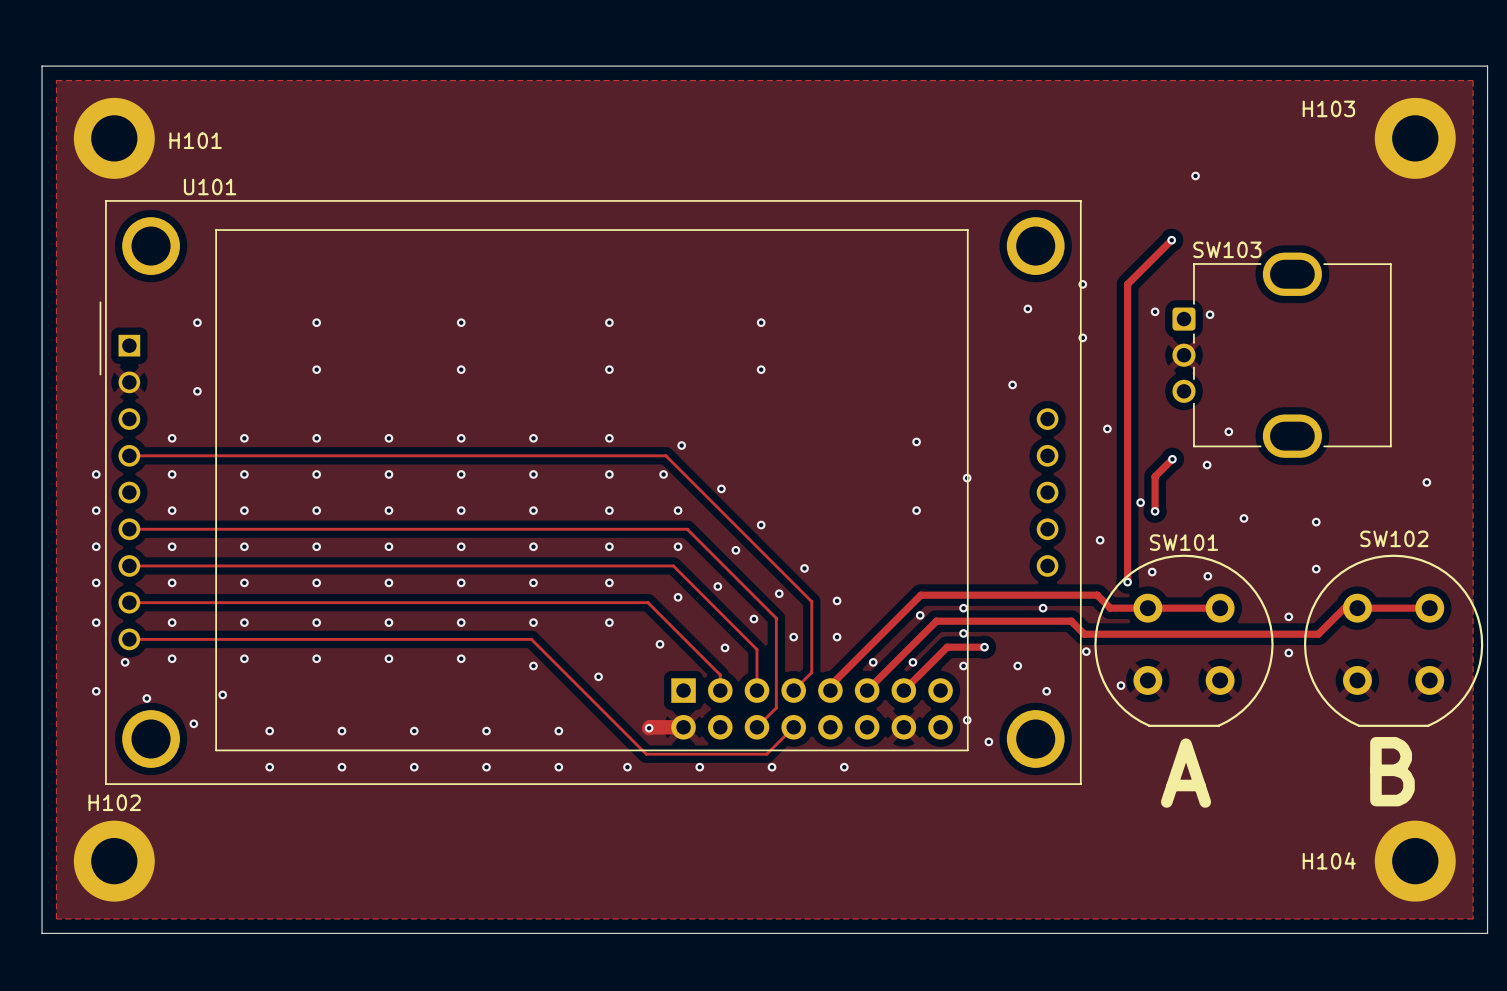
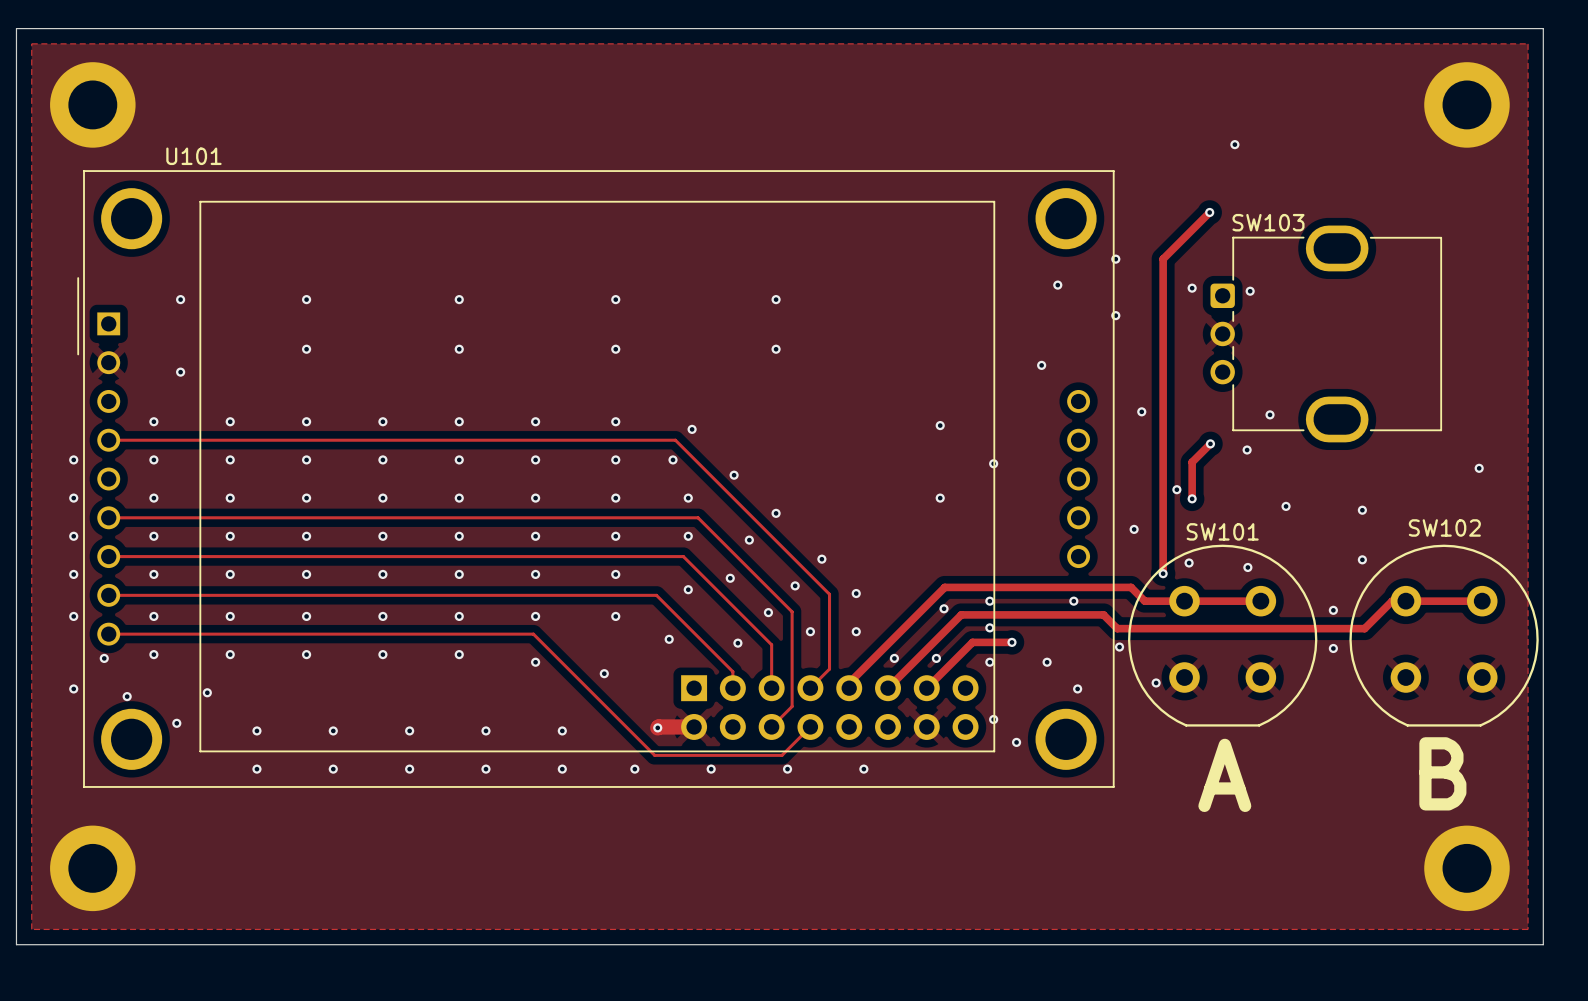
H103 name: H103 (1328, 108) -> none
H101 name: H101 (195, 140) -> none
H102 name: H102 (114, 802) -> none
H104 name: H104 (1329, 860) -> none

